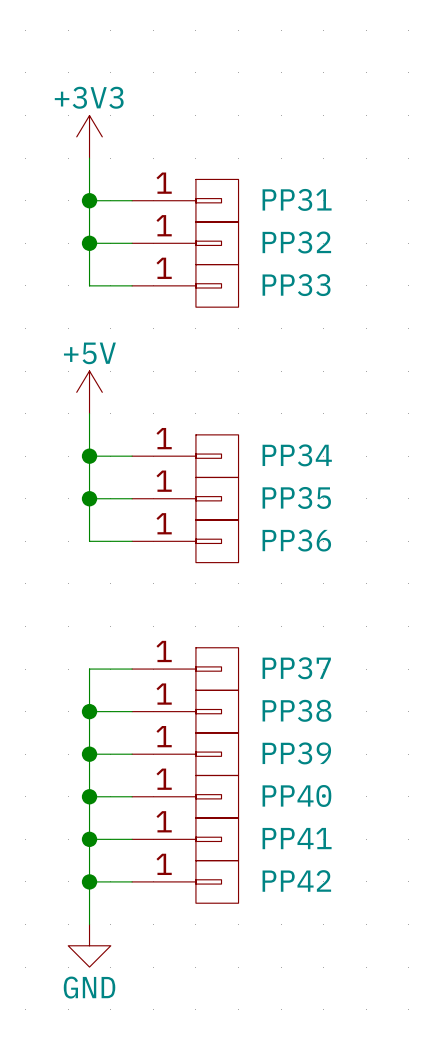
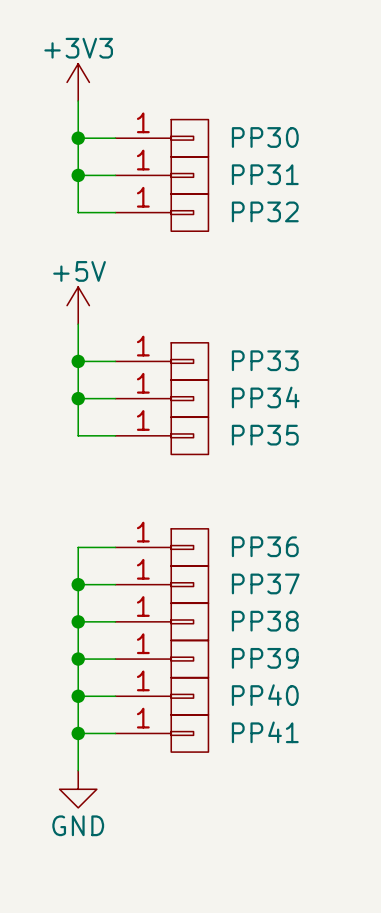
power symbol position: +3V3 (89, 136) -> +3V3 (78, 82)
junction: none -> (78, 138)
PP30: none -> (161, 138)
wire: (89, 243) (89, 285) (132, 285) -> (78, 100) (78, 138) (115, 138)
junction: (89, 243) -> none
PP33 position: (185, 285) -> (161, 361)
power symbol position: +5V (89, 392) -> +5V (78, 305)
junction: none -> (78, 361)
wire: (89, 498) (89, 541) (132, 541) -> (78, 324) (78, 361) (115, 361)
junction: (89, 498) -> none
PP36 position: (185, 541) -> (161, 547)
junction: none -> (78, 584)
junction: (89, 881) -> none
wire: (132, 881) (89, 881) (89, 924) -> (115, 547) (78, 547) (78, 584)
PP42: (185, 881) -> none
power symbol position: GND (89, 945) -> GND (78, 789)

